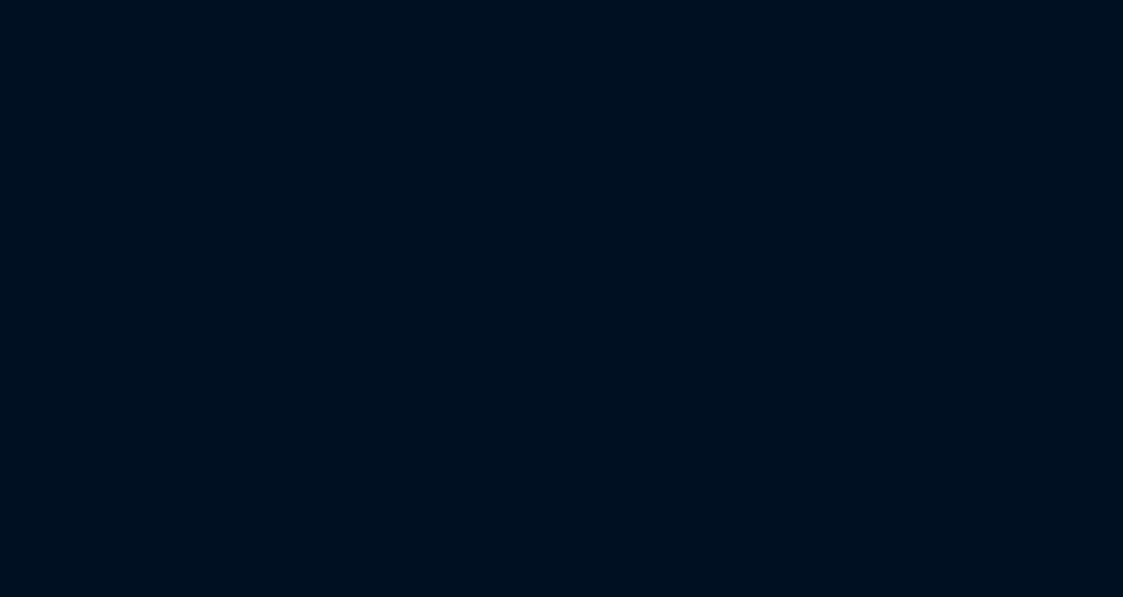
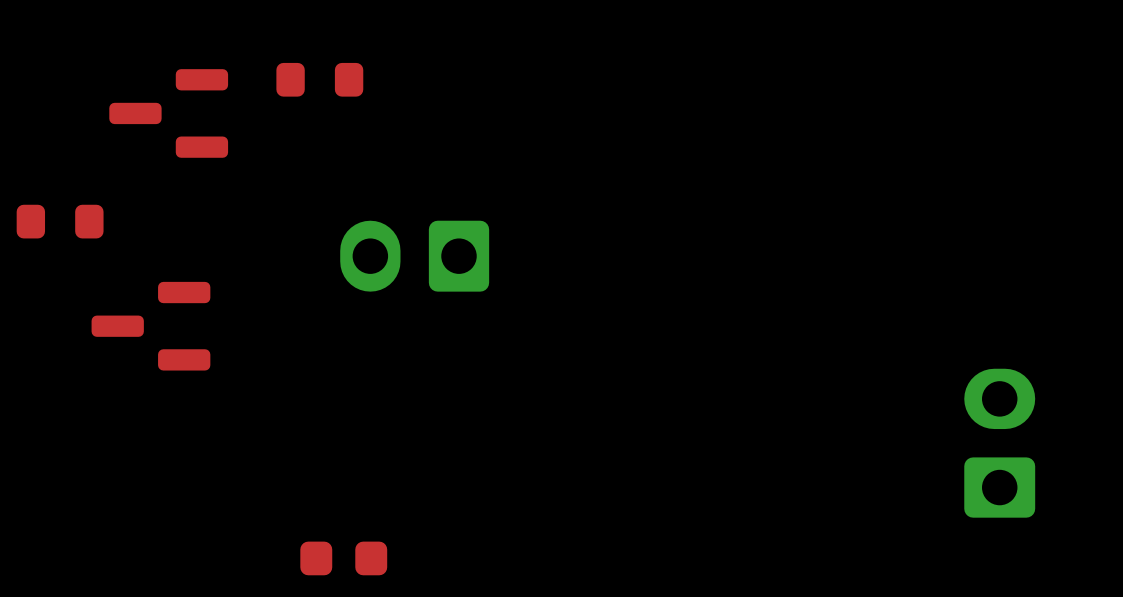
part: none -> (319, 79)
part: none -> (168, 113)
part: none -> (60, 221)
part: none -> (414, 256)
part: none -> (150, 326)
part: none -> (999, 443)
part: none -> (343, 558)

